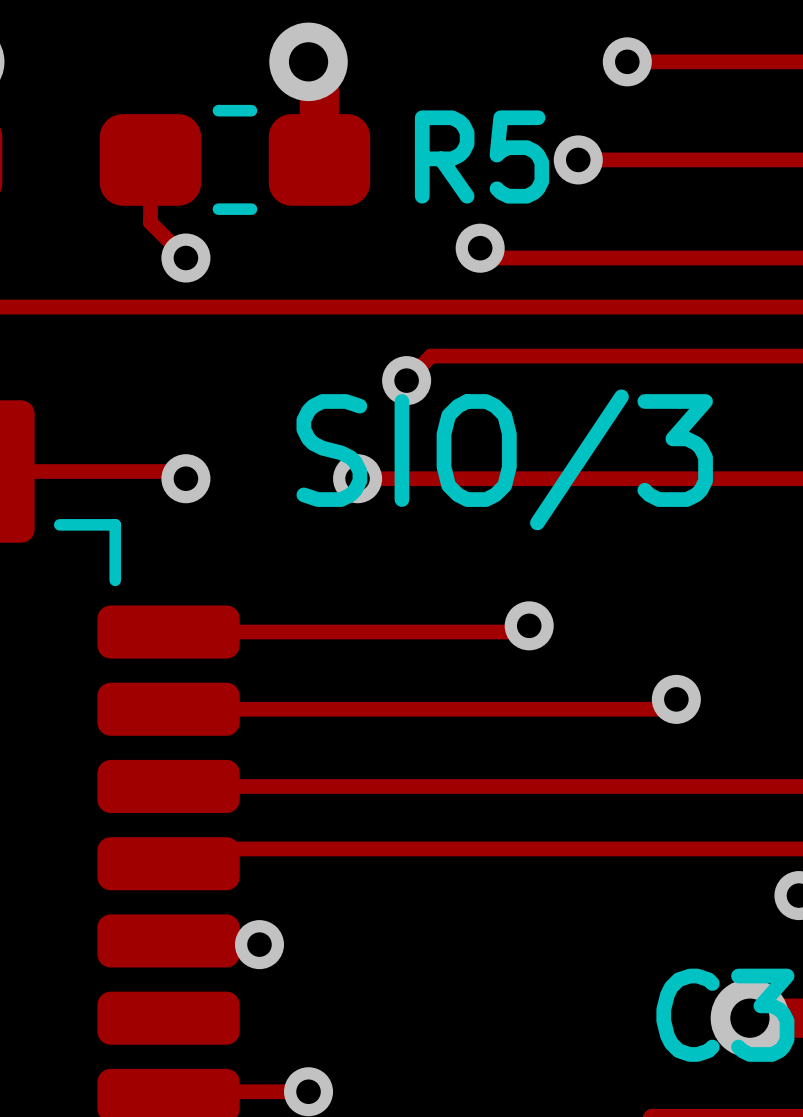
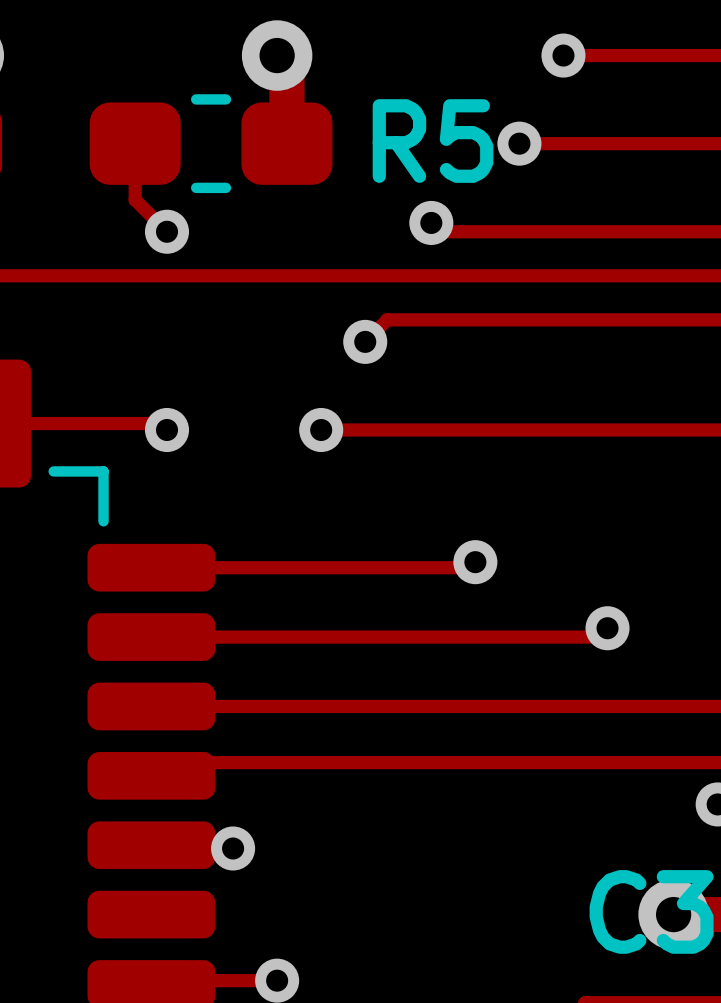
text: SIO/3 (504, 459) -> none

